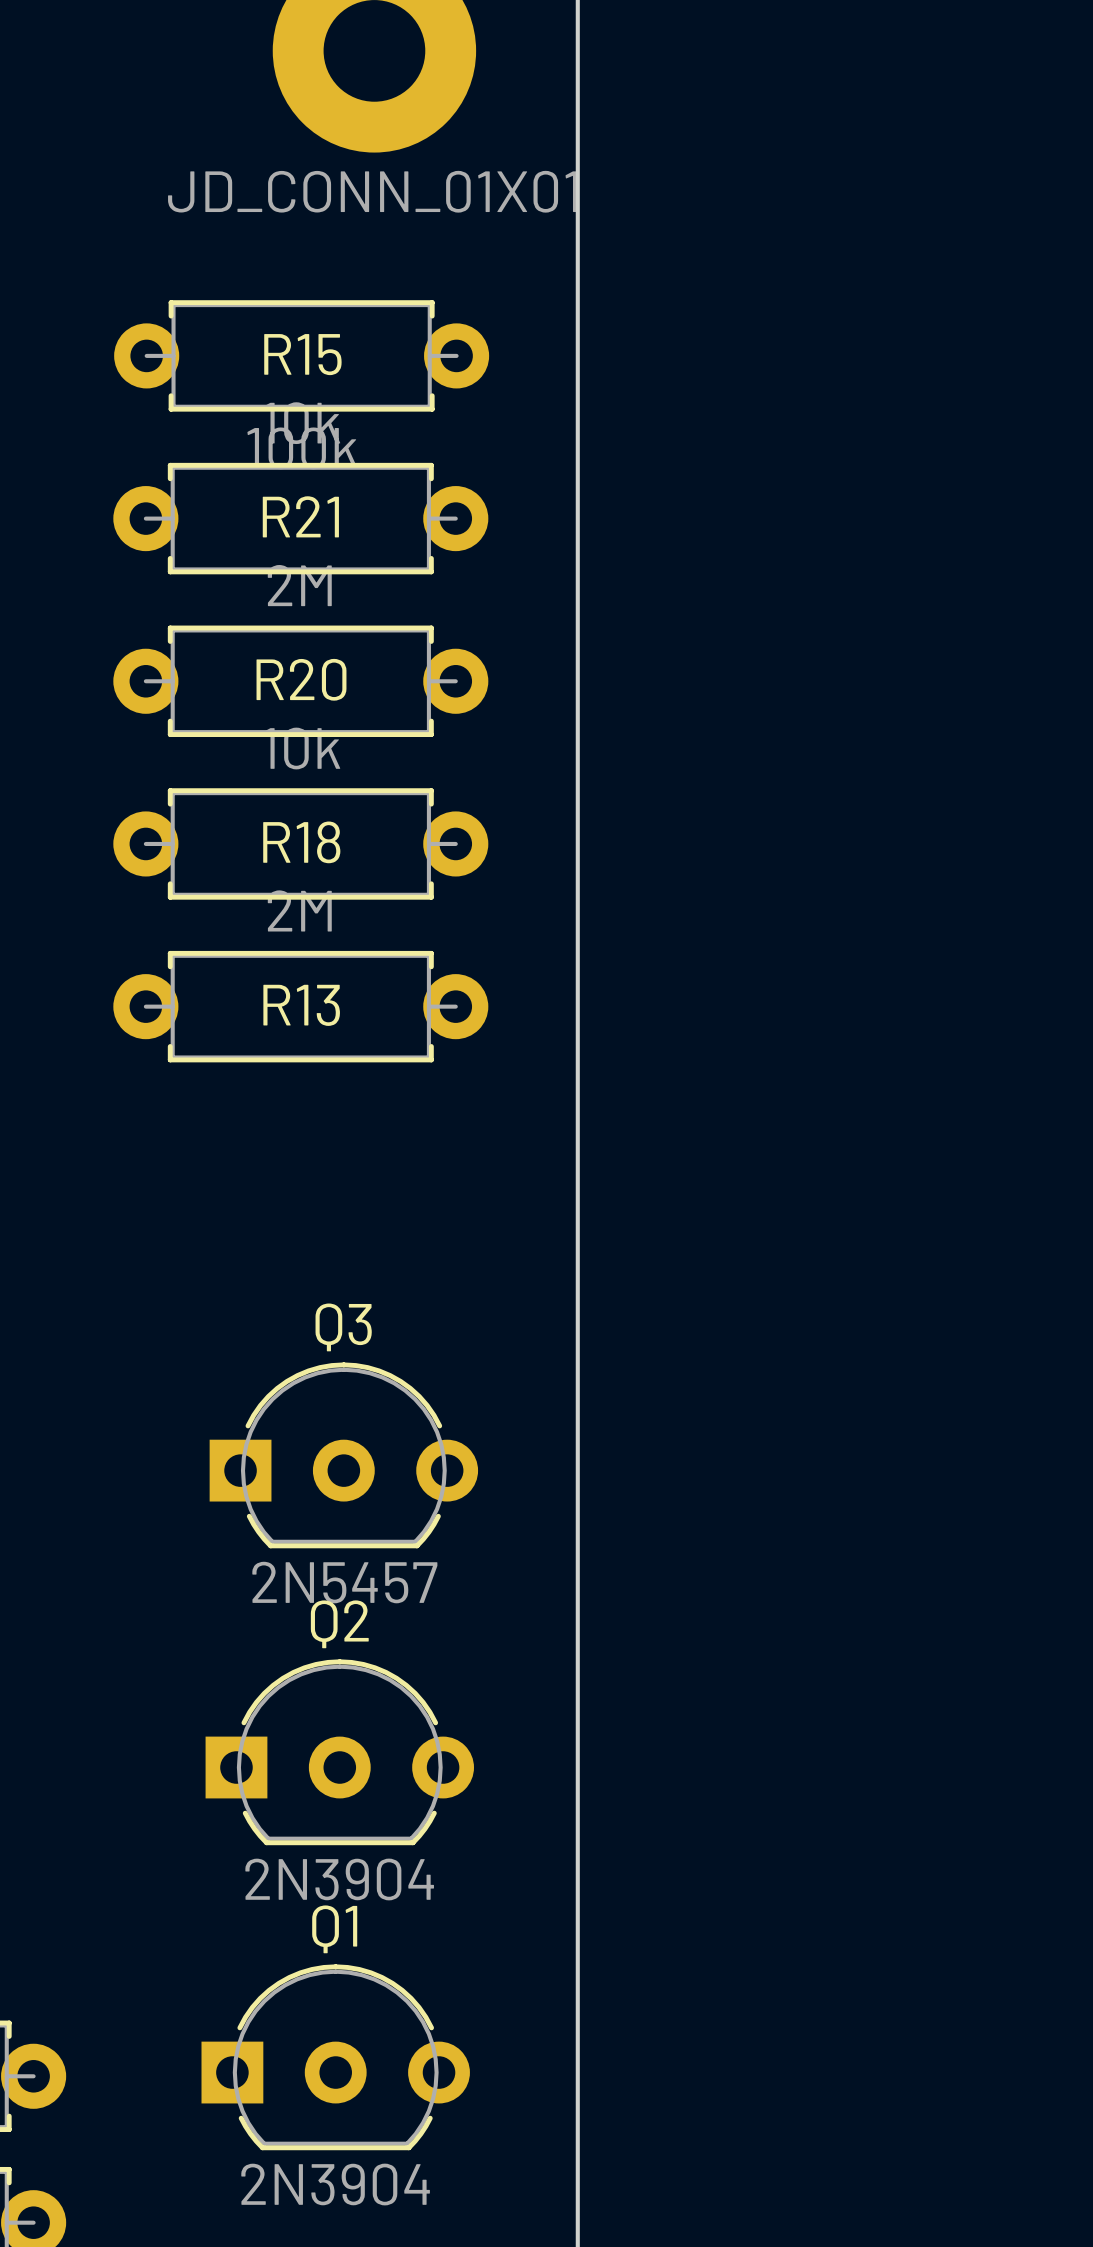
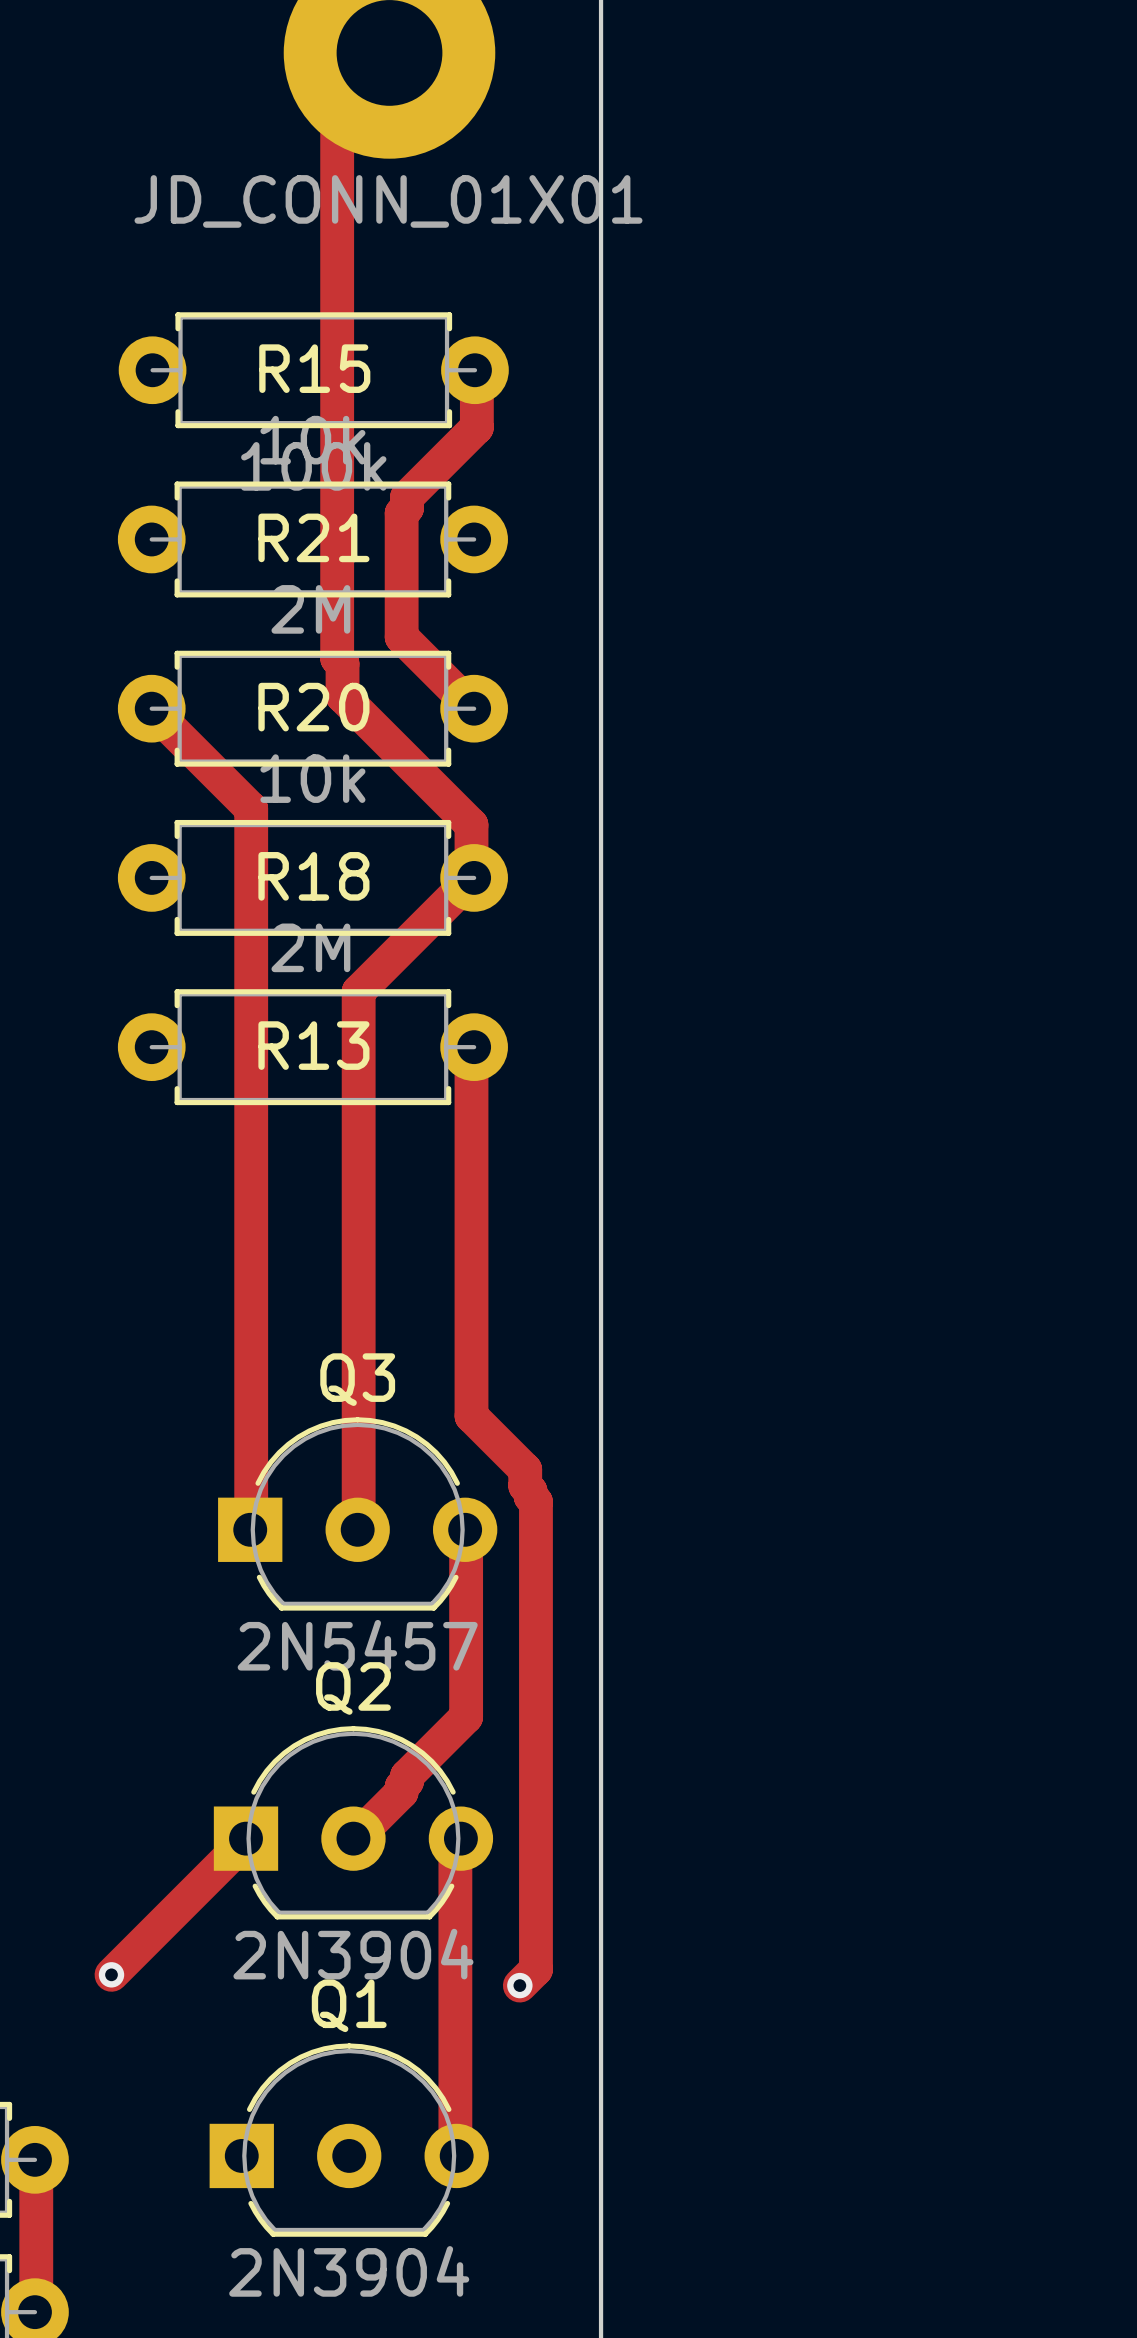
track: none -> (389, 52) (390, 51) (337, 105) (337, 658) (342, 663) (342, 696) (471, 825) (471, 878)
track: none -> (474, 370) (476, 368) (476, 427) (407, 497) (407, 507) (401, 513) (401, 636) (474, 708)
track: none -> (151, 708) (149, 706) (251, 808) (250, 1529)
track: none -> (471, 878) (358, 991) (357, 1529)
track: none -> (474, 1047) (471, 1045) (471, 1416) (525, 1469) (525, 1485) (535, 1502) (535, 1969) (519, 1985)
track: none -> (465, 1529) (466, 1716) (407, 1776) (407, 1781) (401, 1786) (401, 1792) (353, 1840) (353, 1838)
track: none -> (246, 1838) (111, 1974)
track: none -> (460, 1838) (455, 1845) (455, 2157) (456, 2155)
via: none -> (111, 1974)
via: none -> (519, 1985)
track: none -> (34, 2159) (36, 2157) (36, 2313) (34, 2312)

